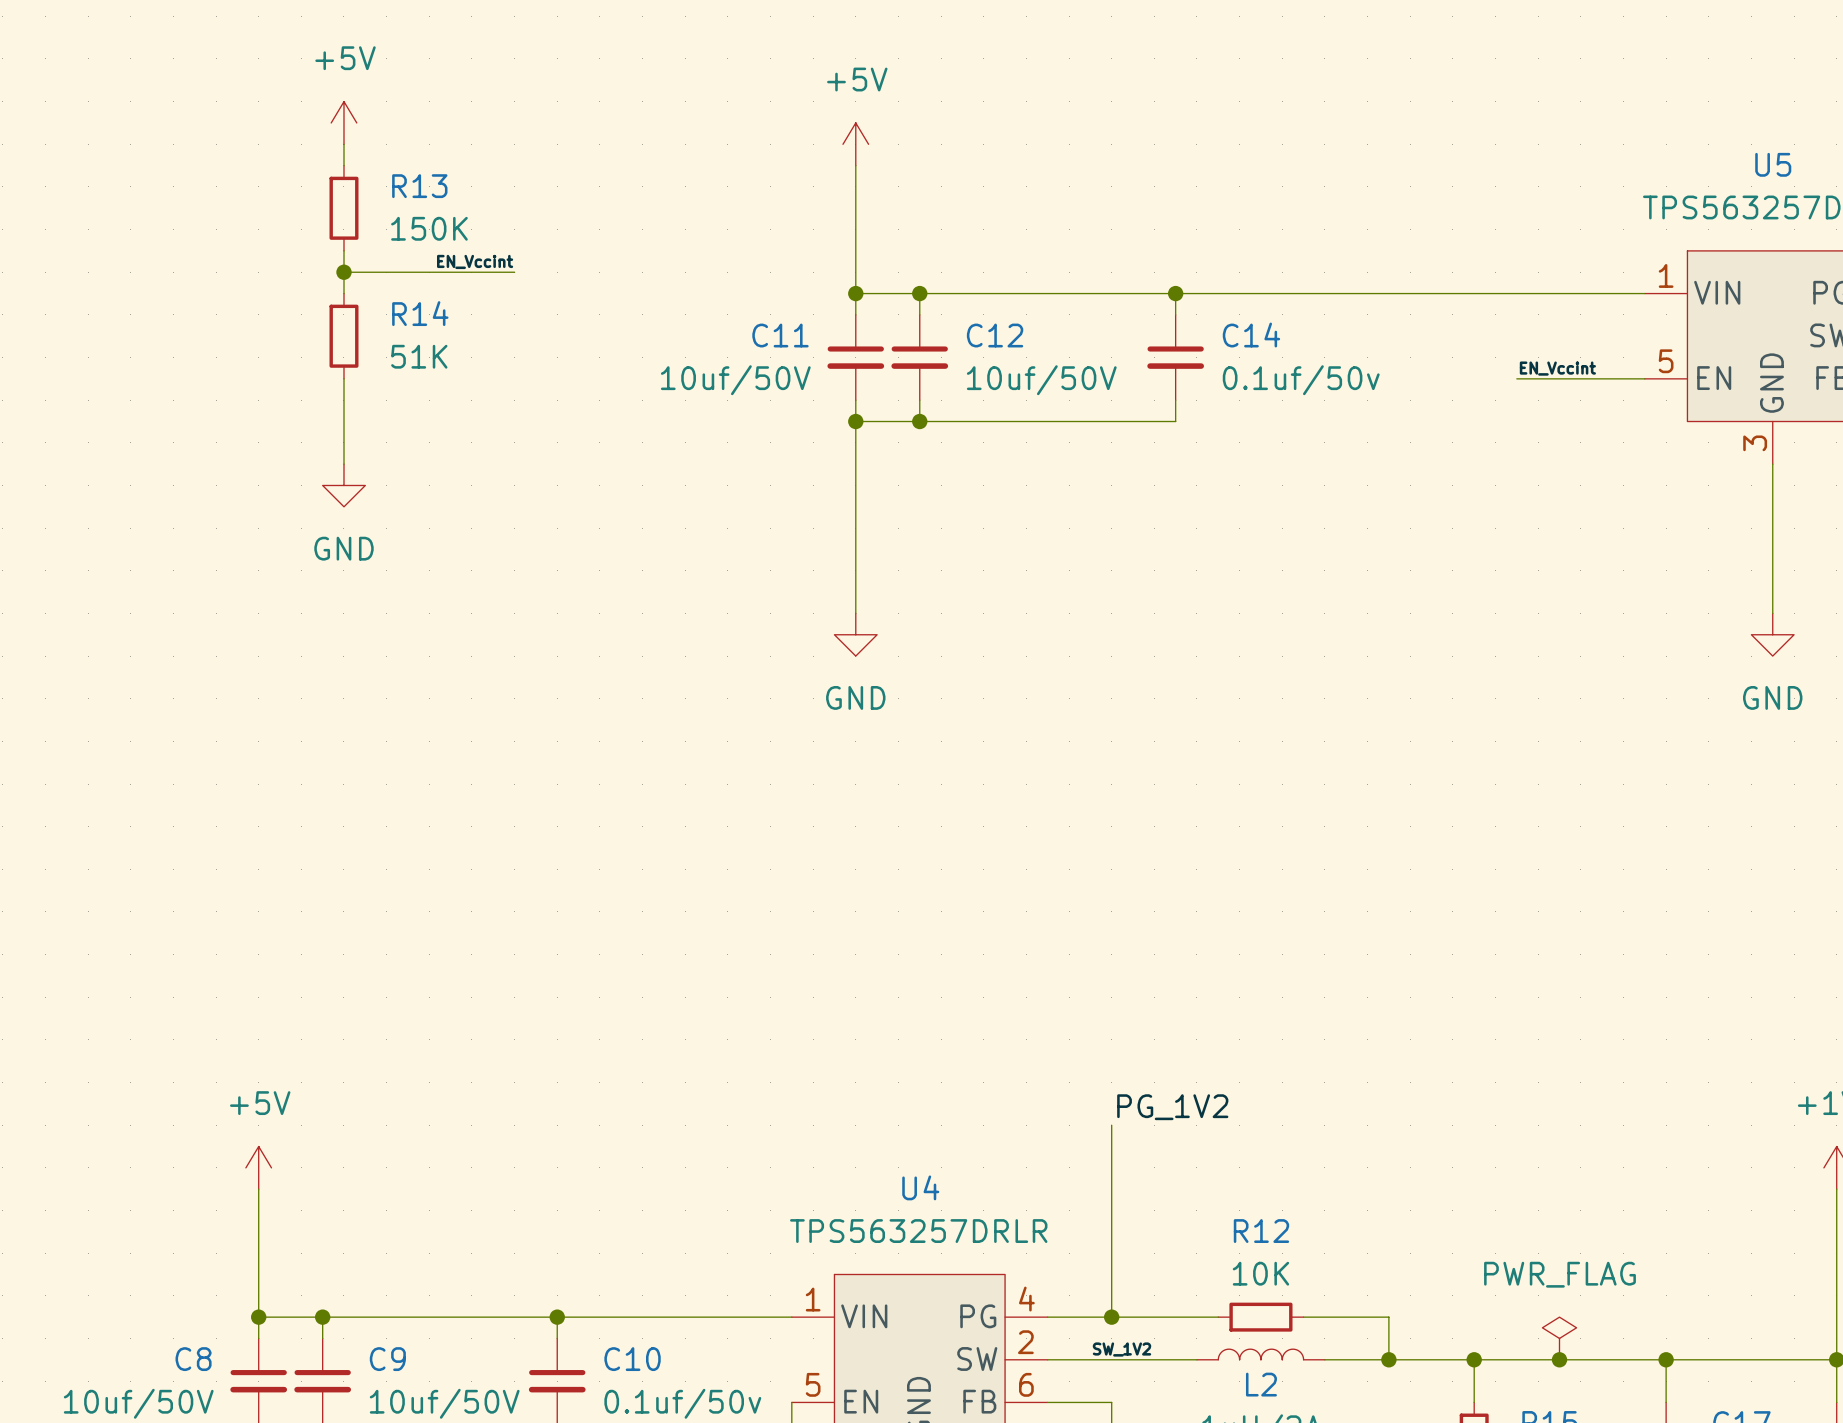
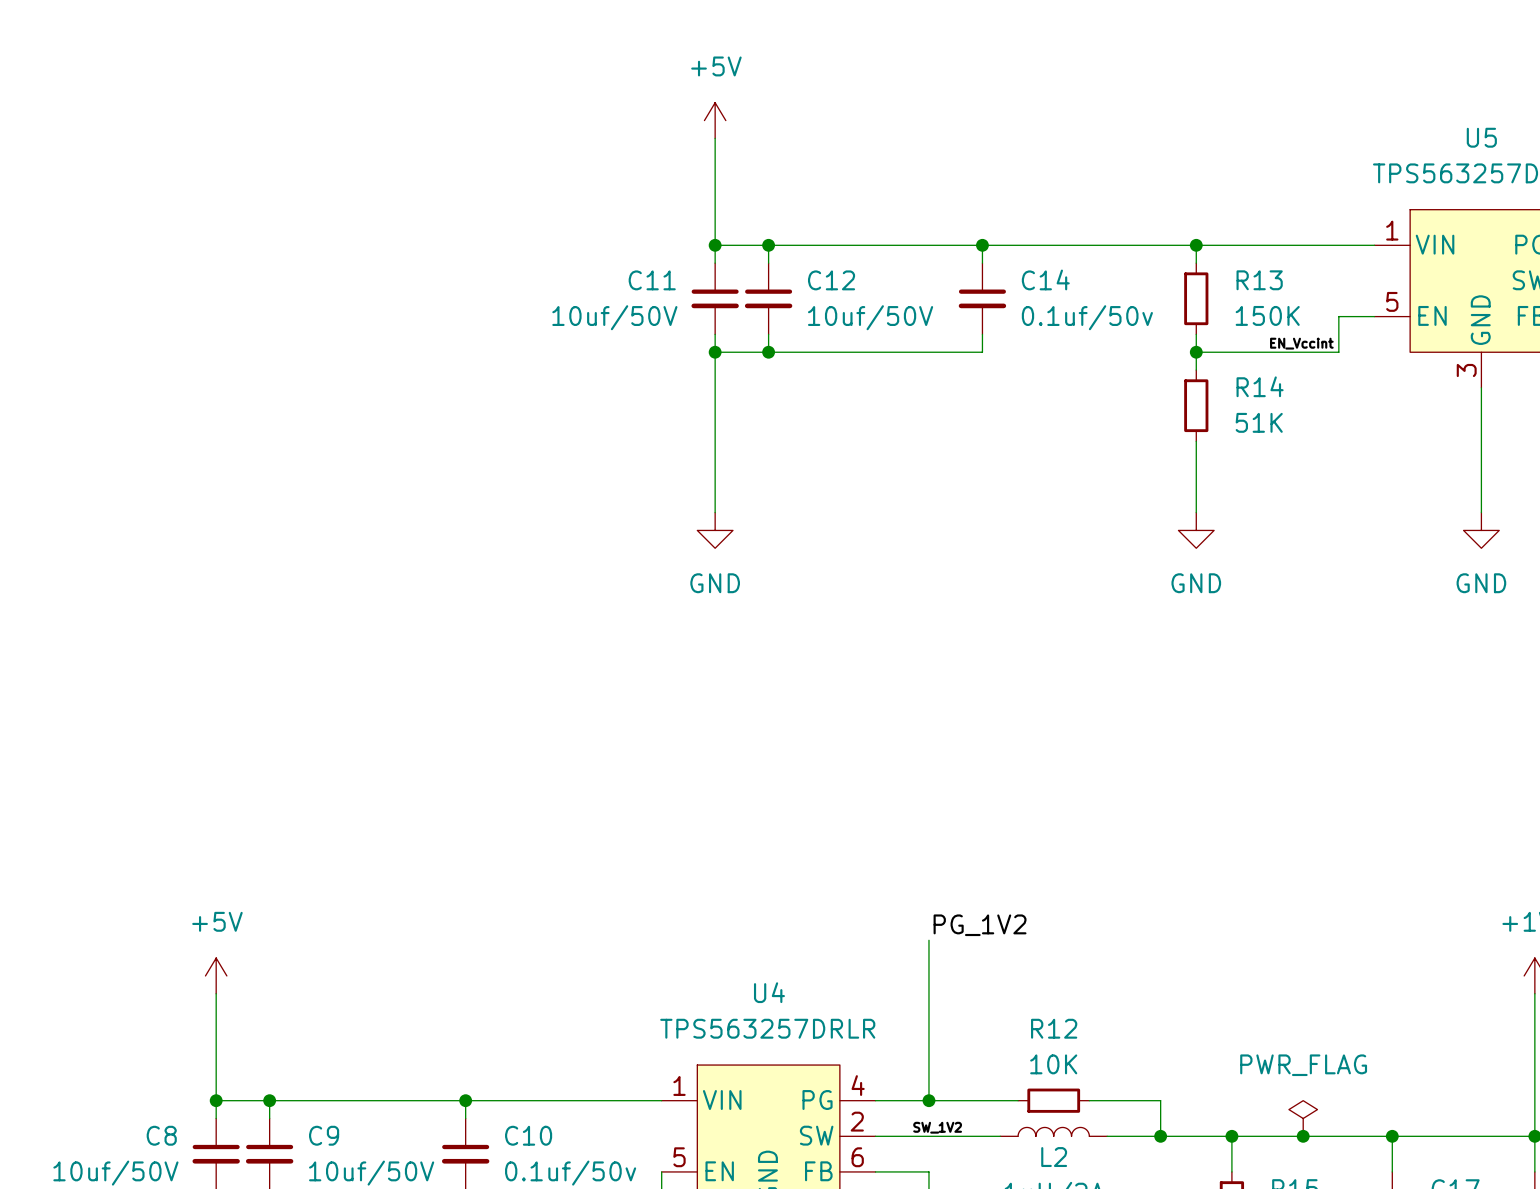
power symbol: +5V (343, 122) -> none
wire: (343, 144) (343, 165) -> none
R13 position: (343, 208) -> (1196, 298)
wire: (343, 250) (343, 293) -> none
label: EN_Vccint (475, 261) -> none
wire: (343, 272) (514, 272) -> none
junction: (343, 272) -> none
wire: none -> (1196, 245) (1196, 263)
junction: none -> (1196, 245)
R14 position: (343, 336) -> (1196, 405)
label position: EN_Vccint (1557, 368) -> EN_Vccint (1301, 343)
wire: (343, 378) (343, 464) -> none
wire: (1516, 378) (1602, 378) -> (1196, 352) (1338, 352) (1338, 316)
wire: none -> (1196, 334) (1196, 370)
junction: none -> (1196, 352)
power symbol: GND (343, 485) -> none
wire: none -> (1196, 441) (1196, 512)
power symbol: none -> GND (1196, 530)

